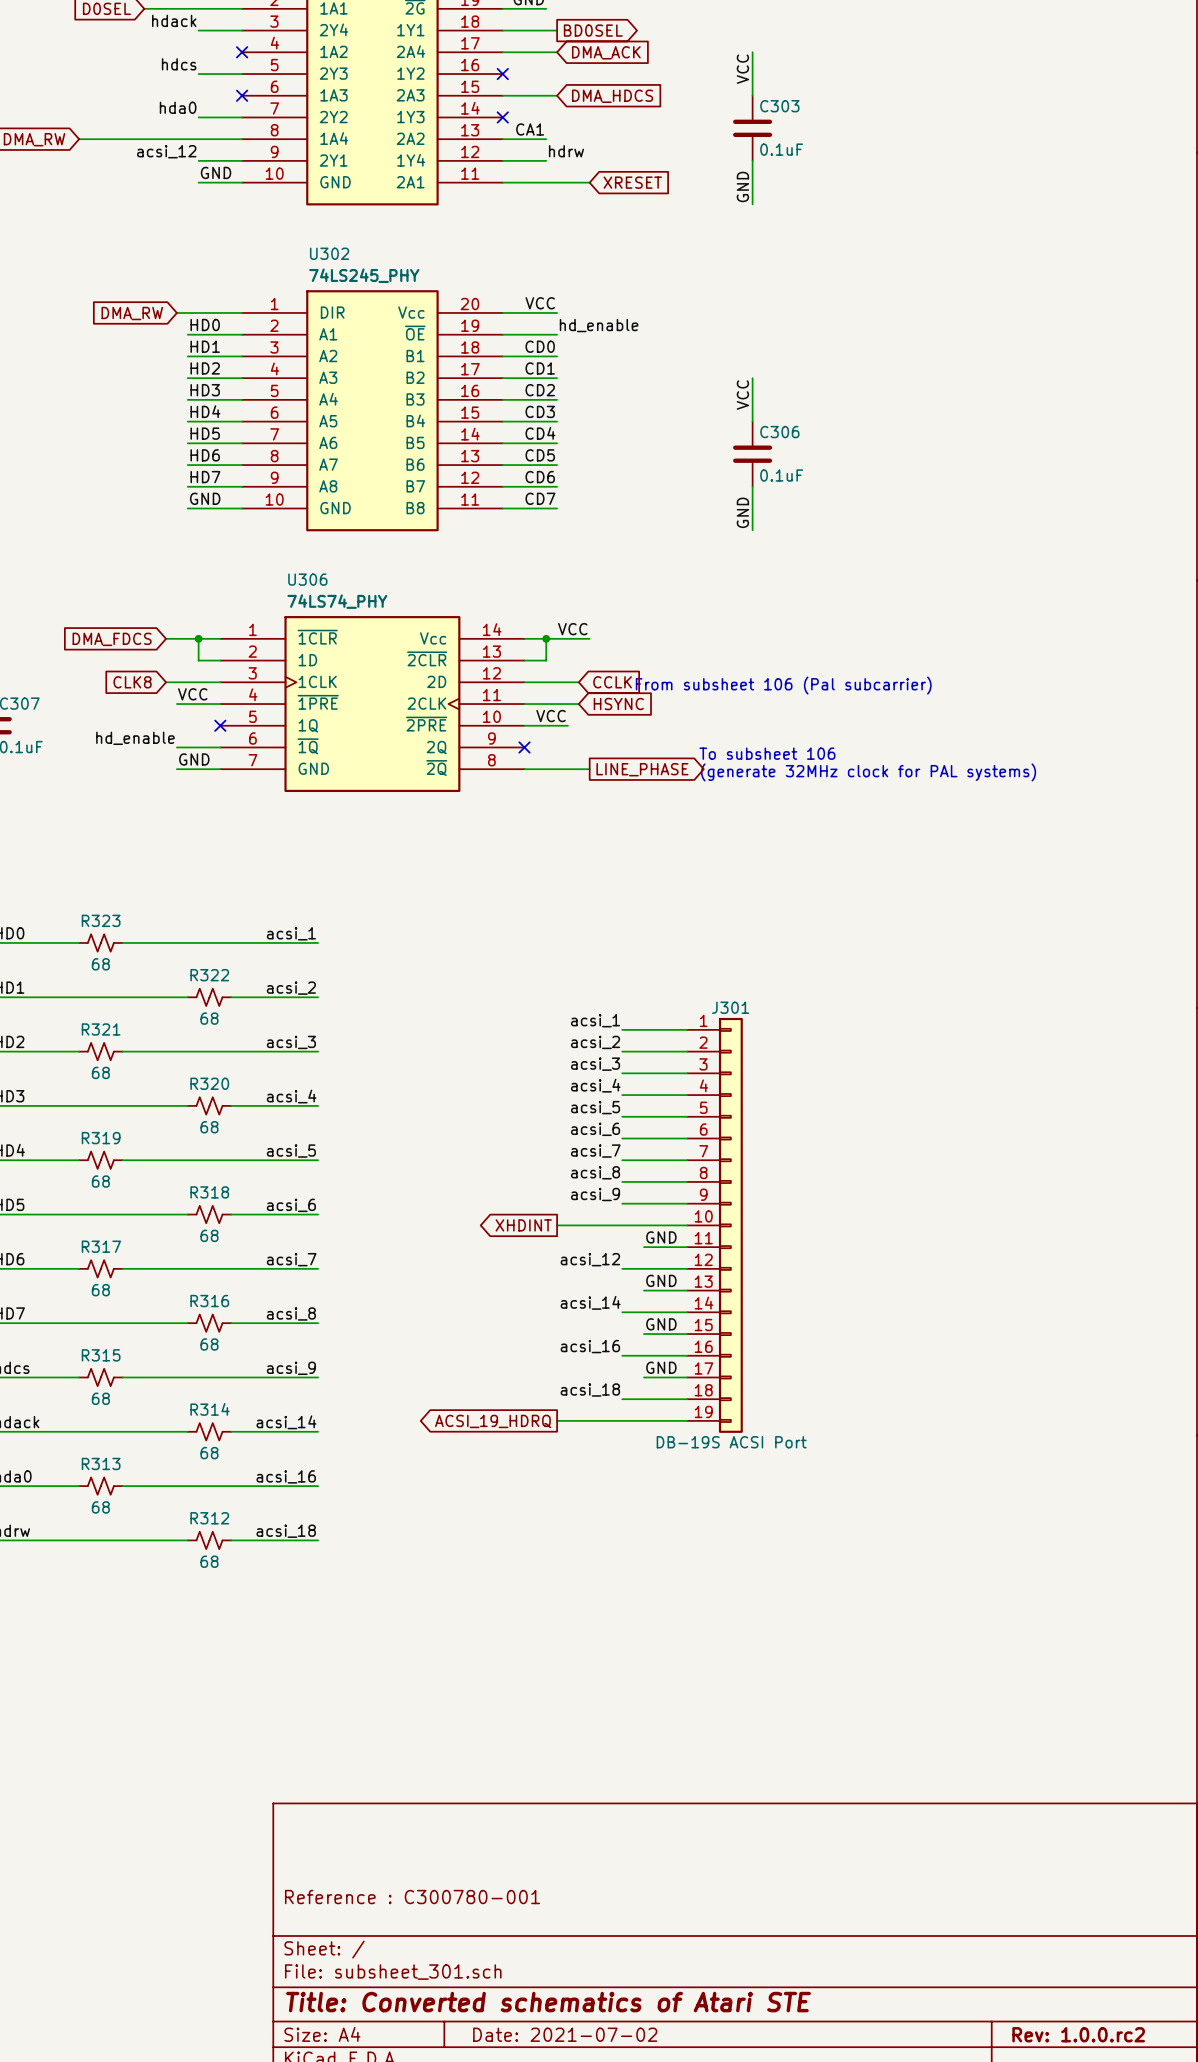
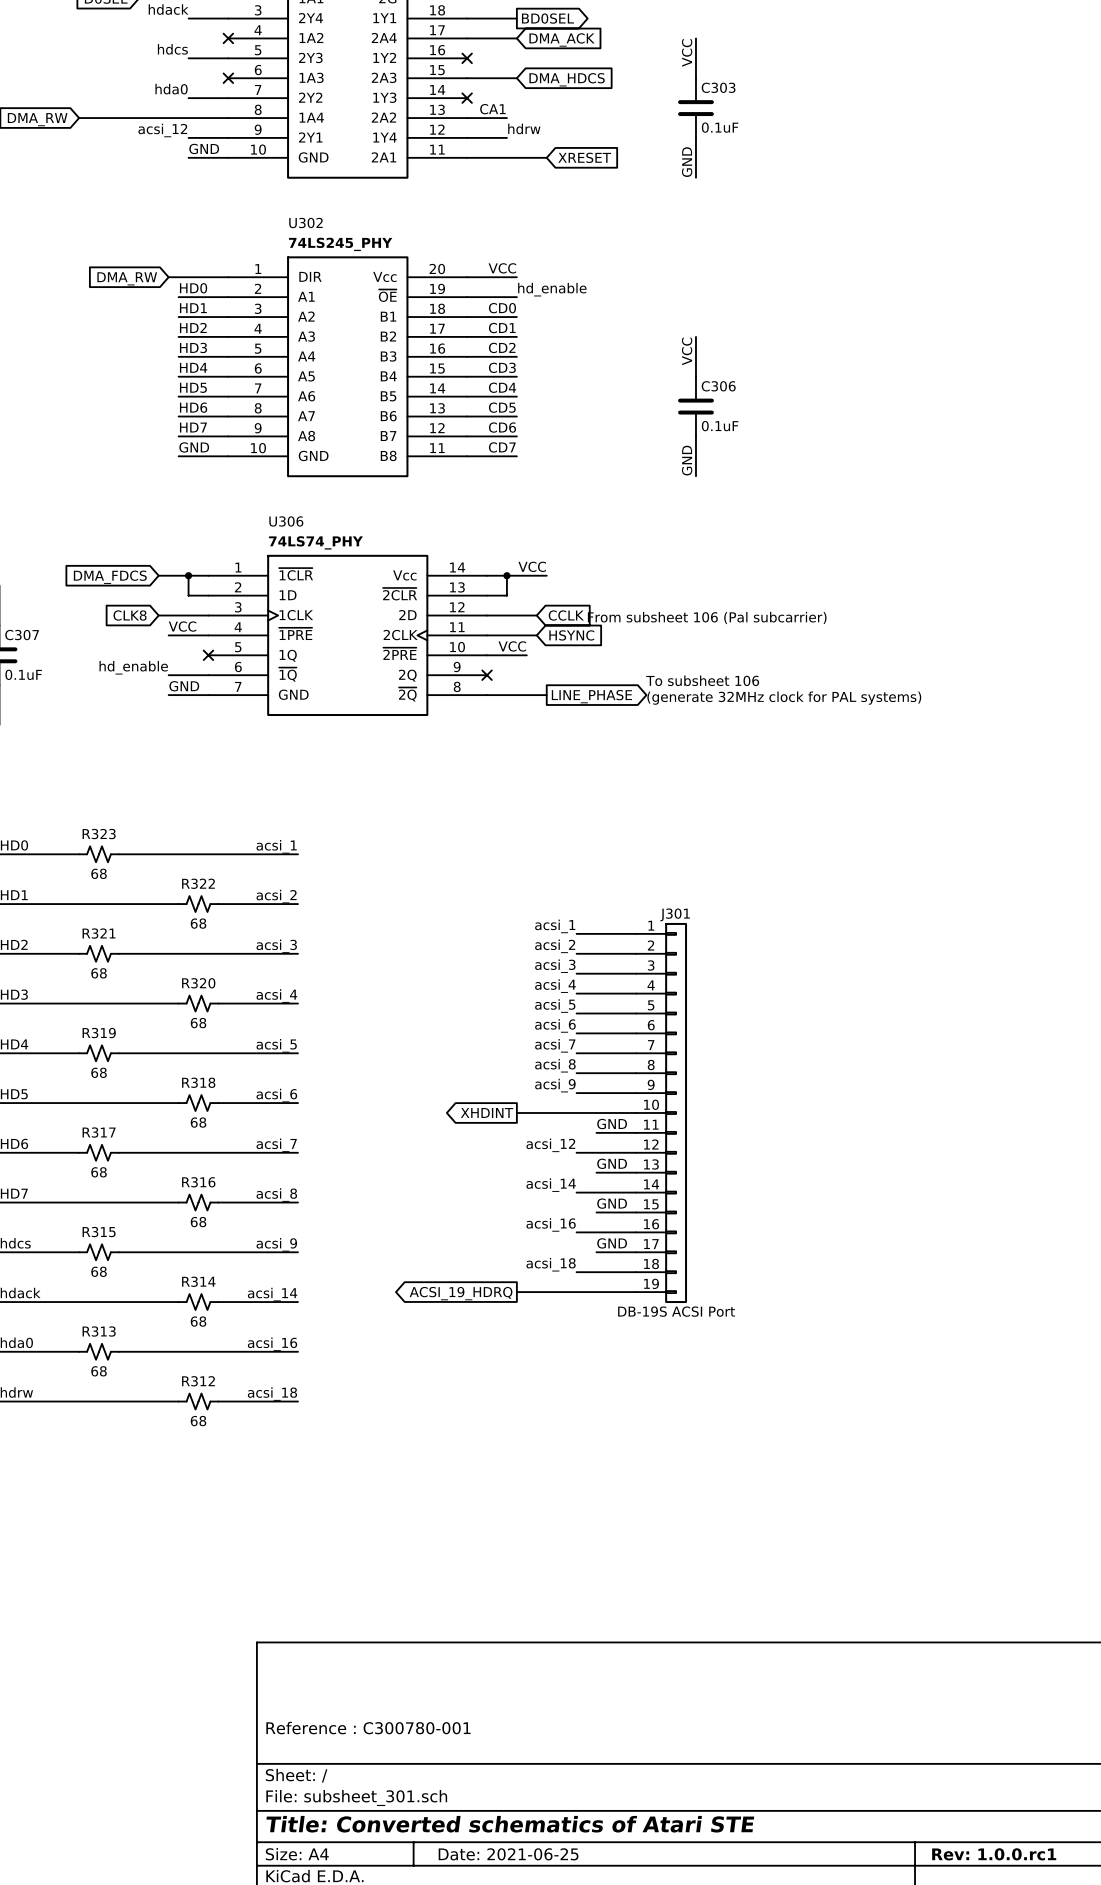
title block: Date: 2021-07-02 (565, 2034) -> Date: 2021-06-25 (508, 1854)
title block: Rev: 1.0.0.rc2 (1078, 2034) -> Rev: 1.0.0.rc1 (994, 1854)

